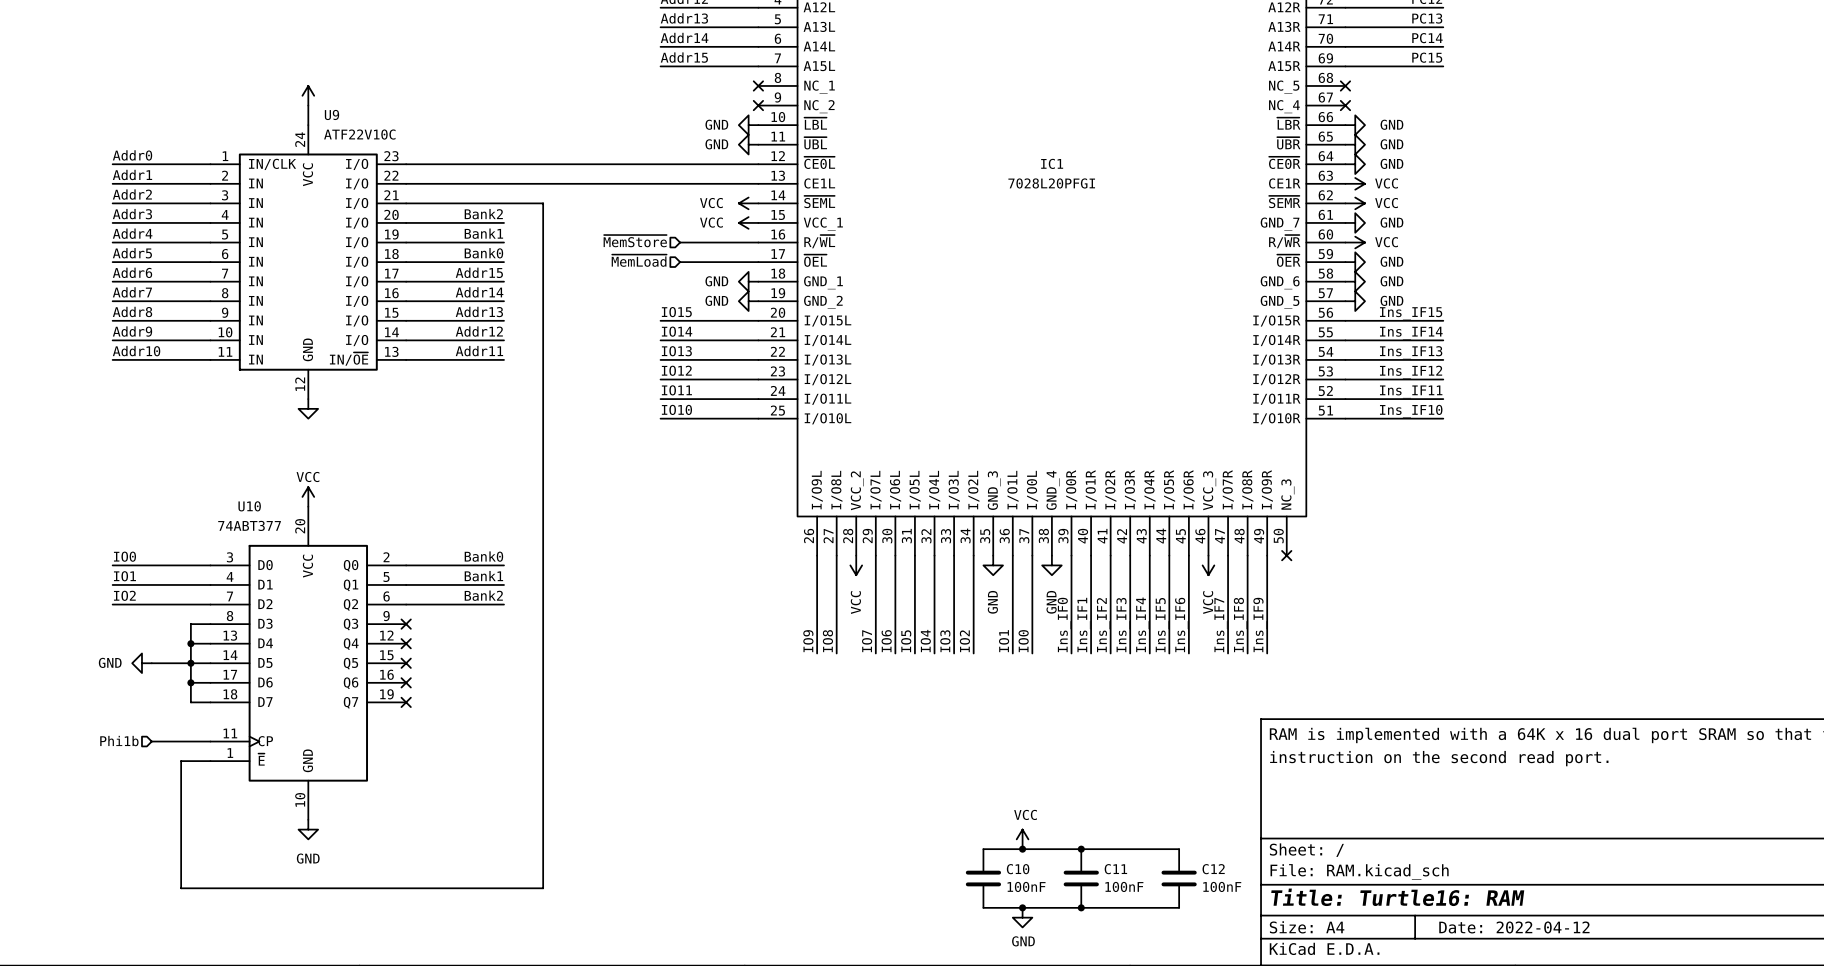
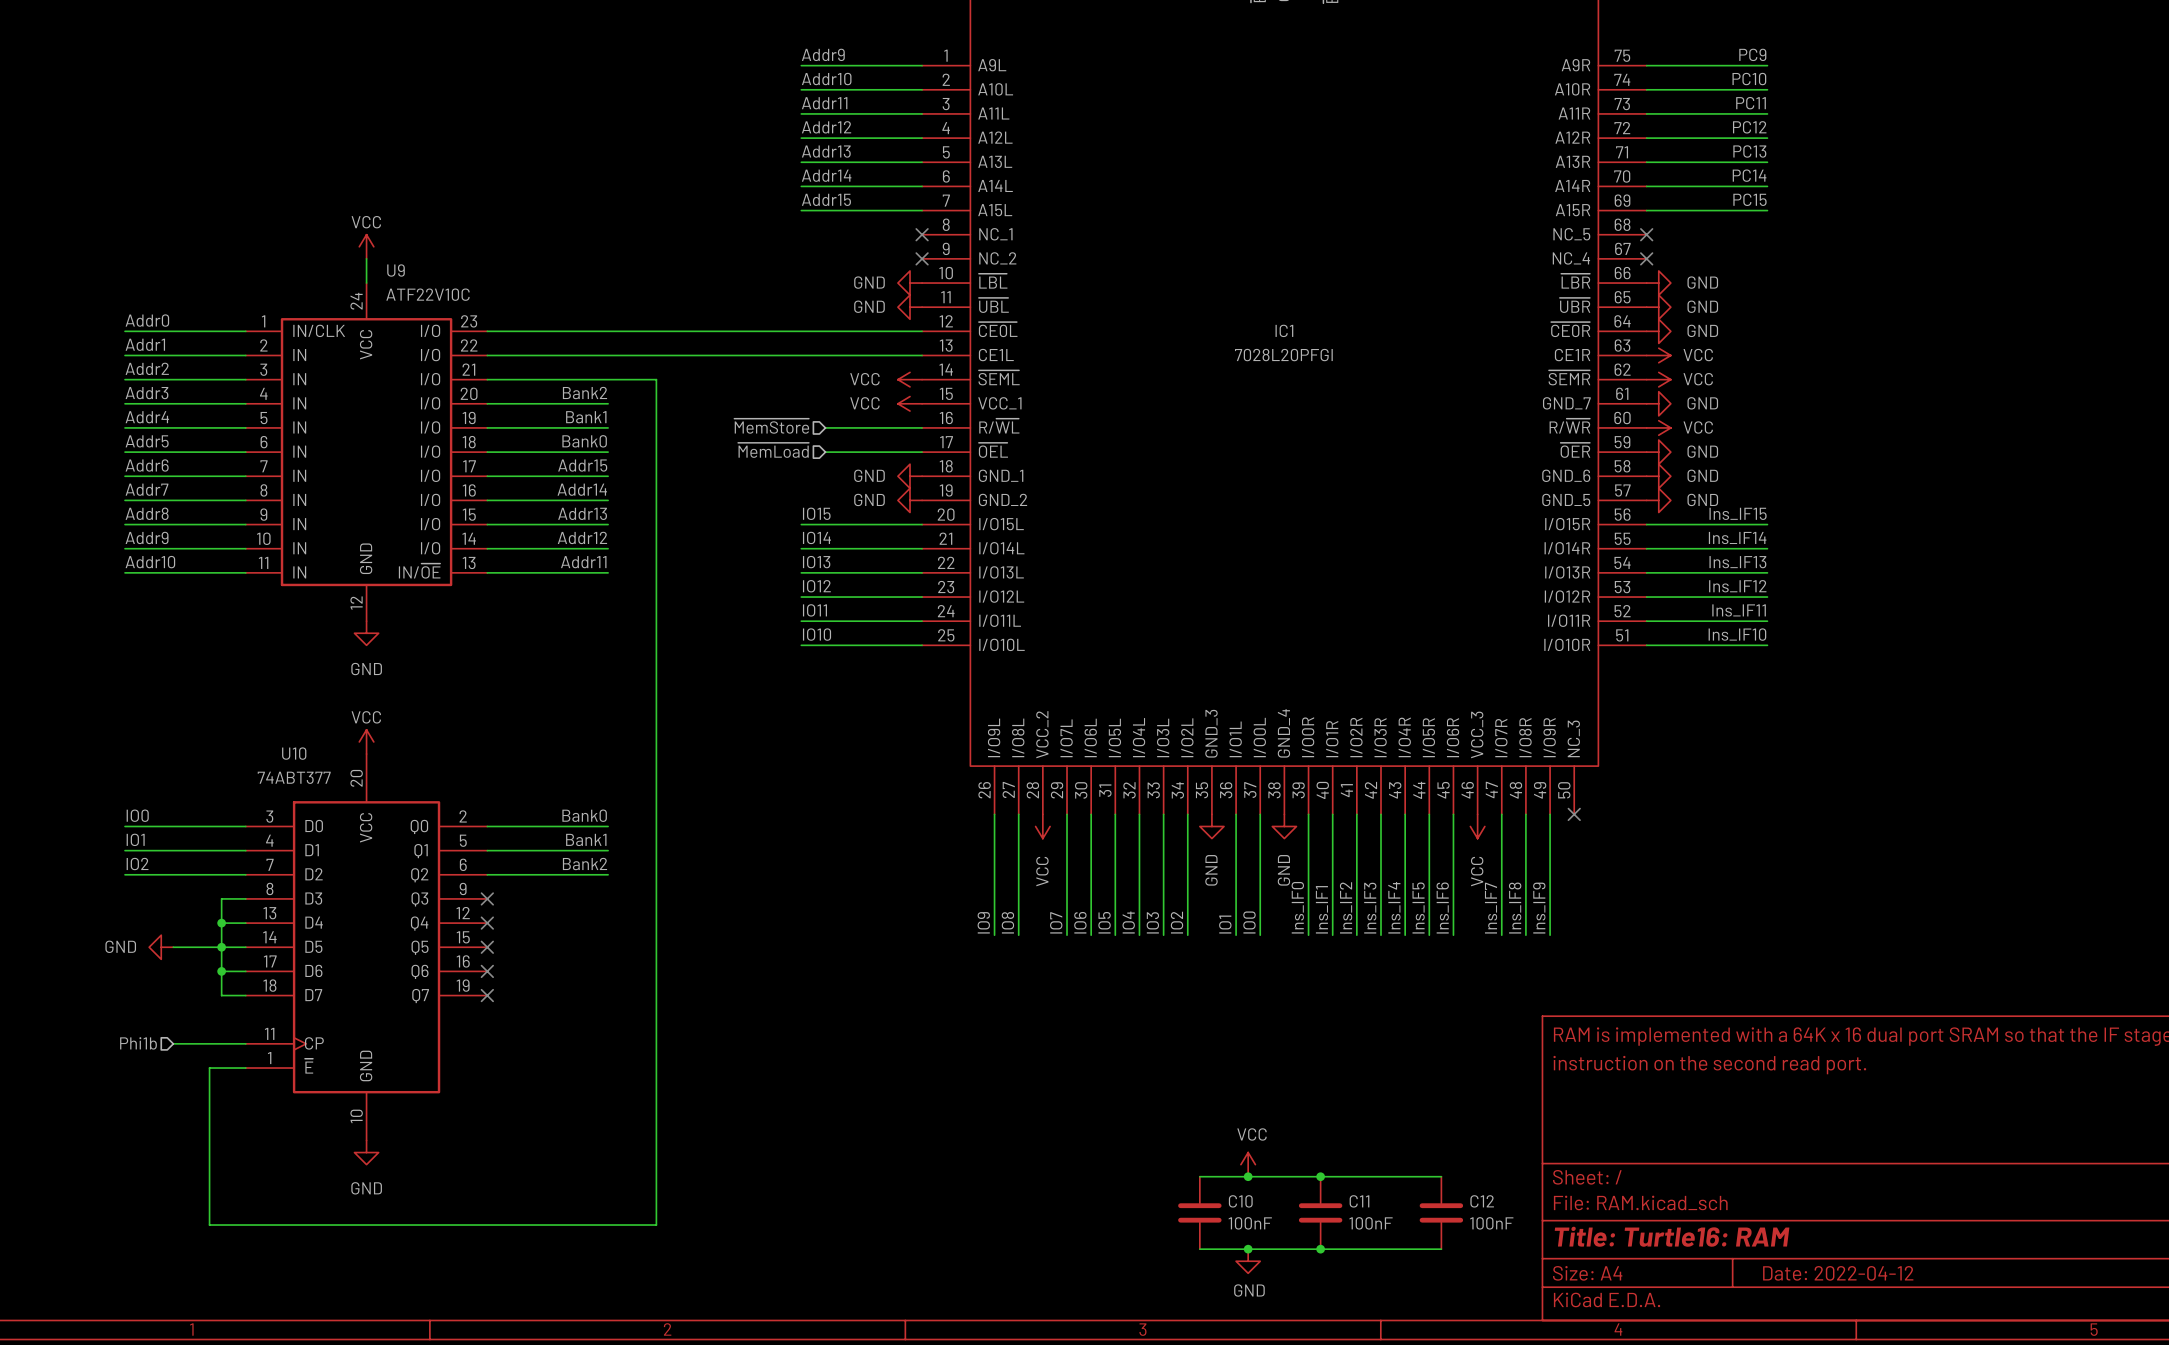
power symbol text: none -> VCC (366, 222)
power symbol text: none -> GND (366, 669)

